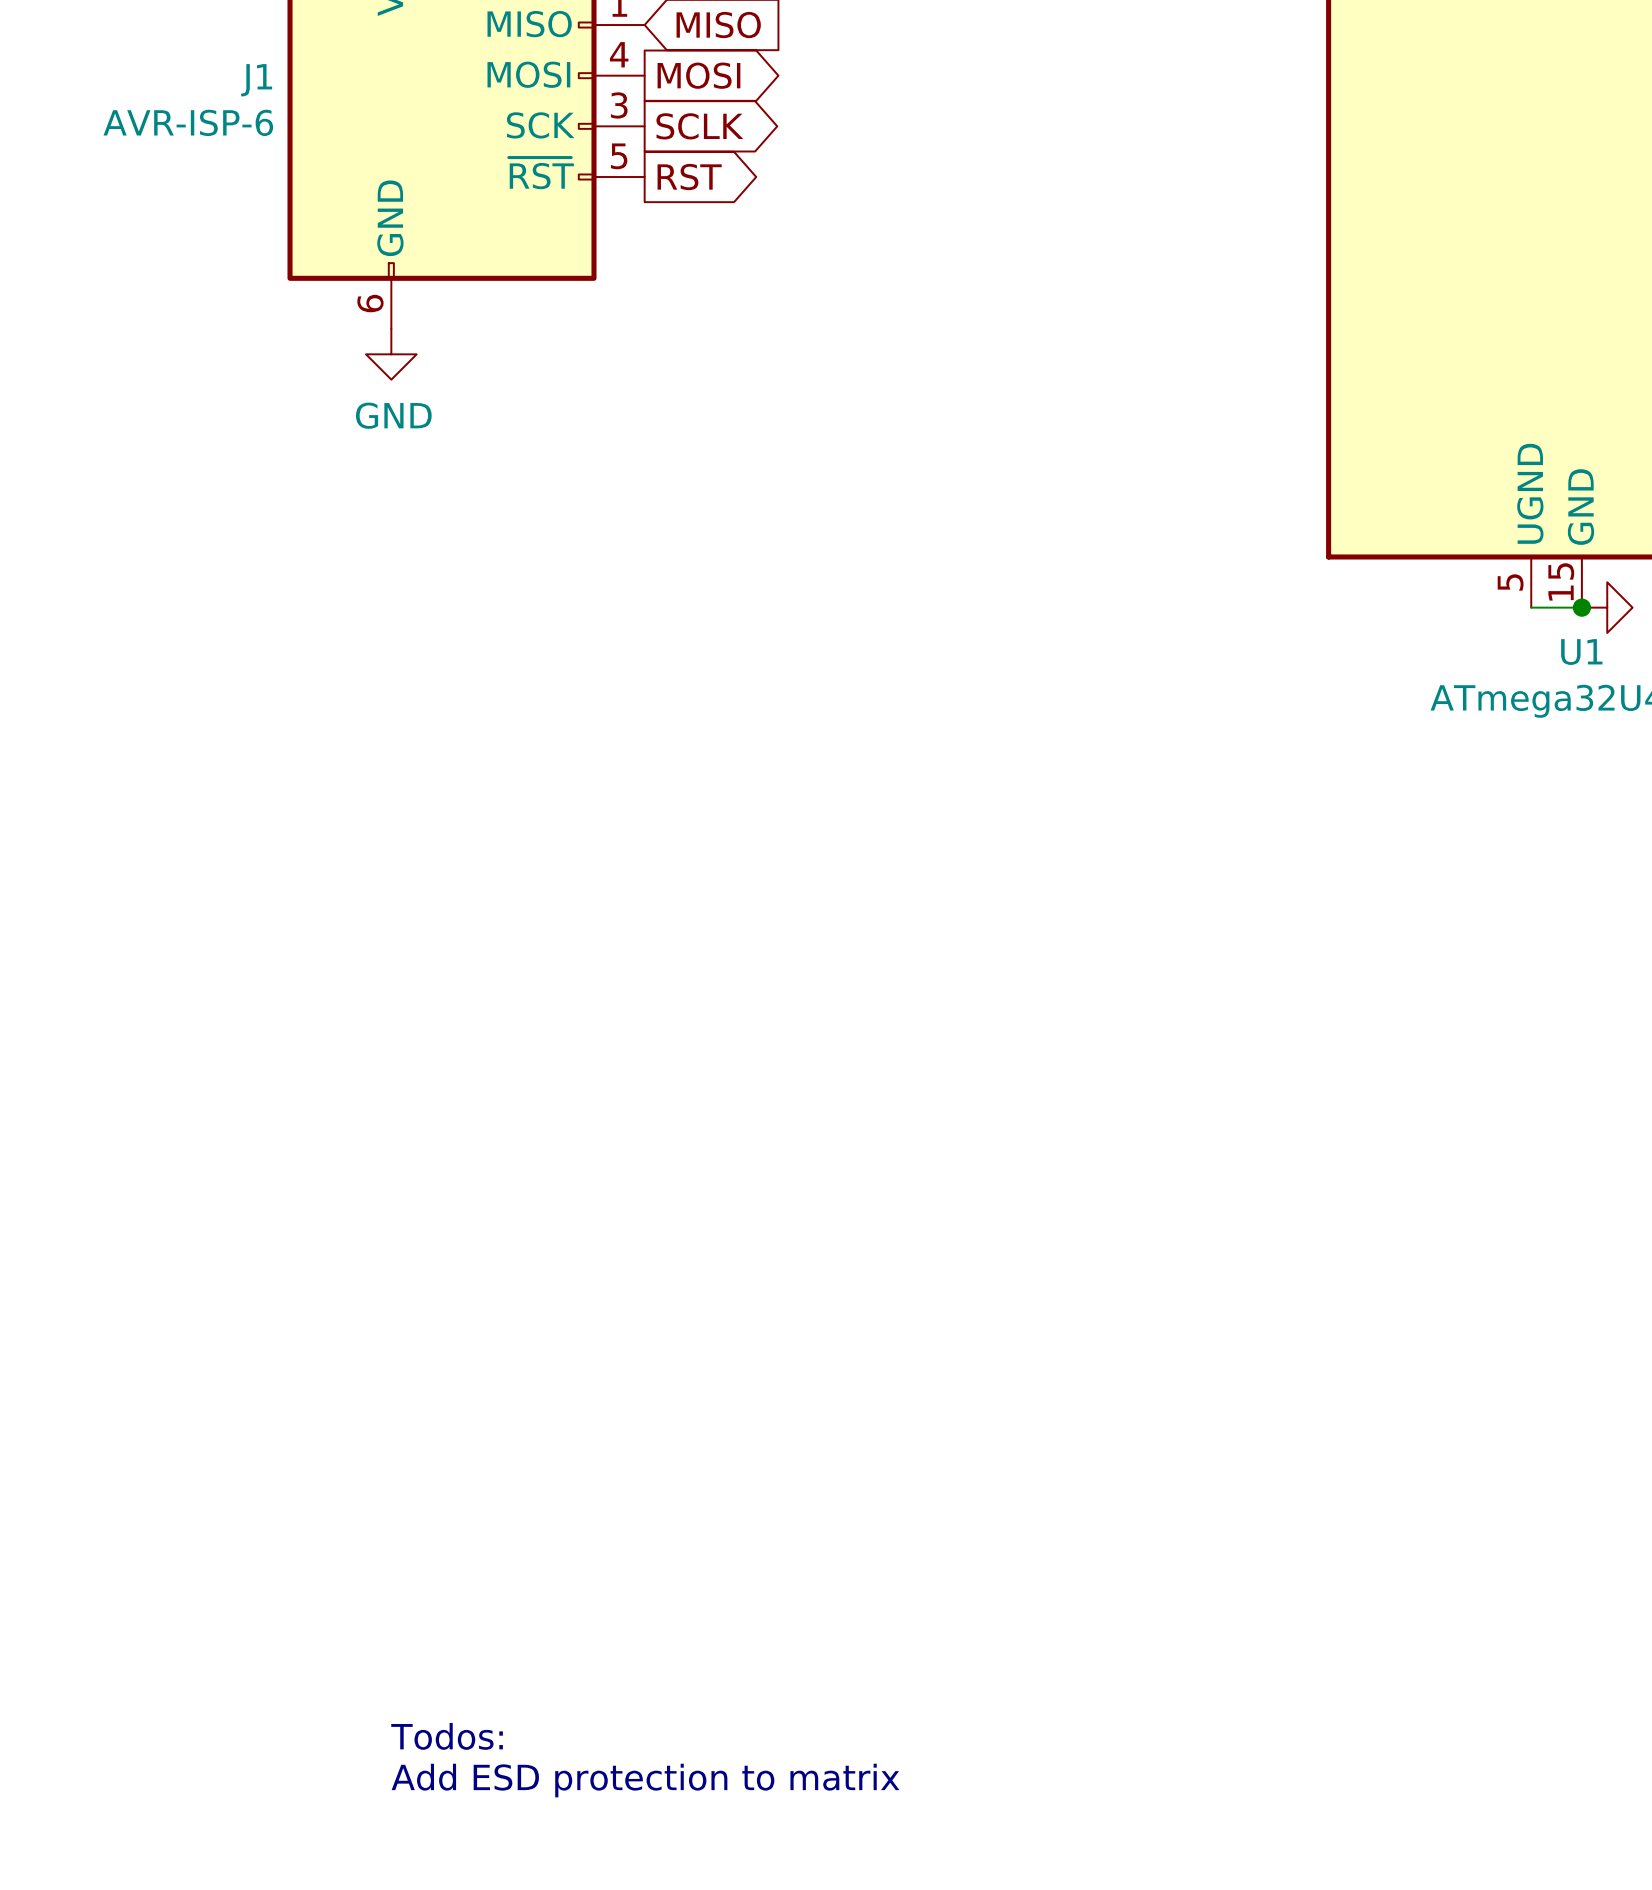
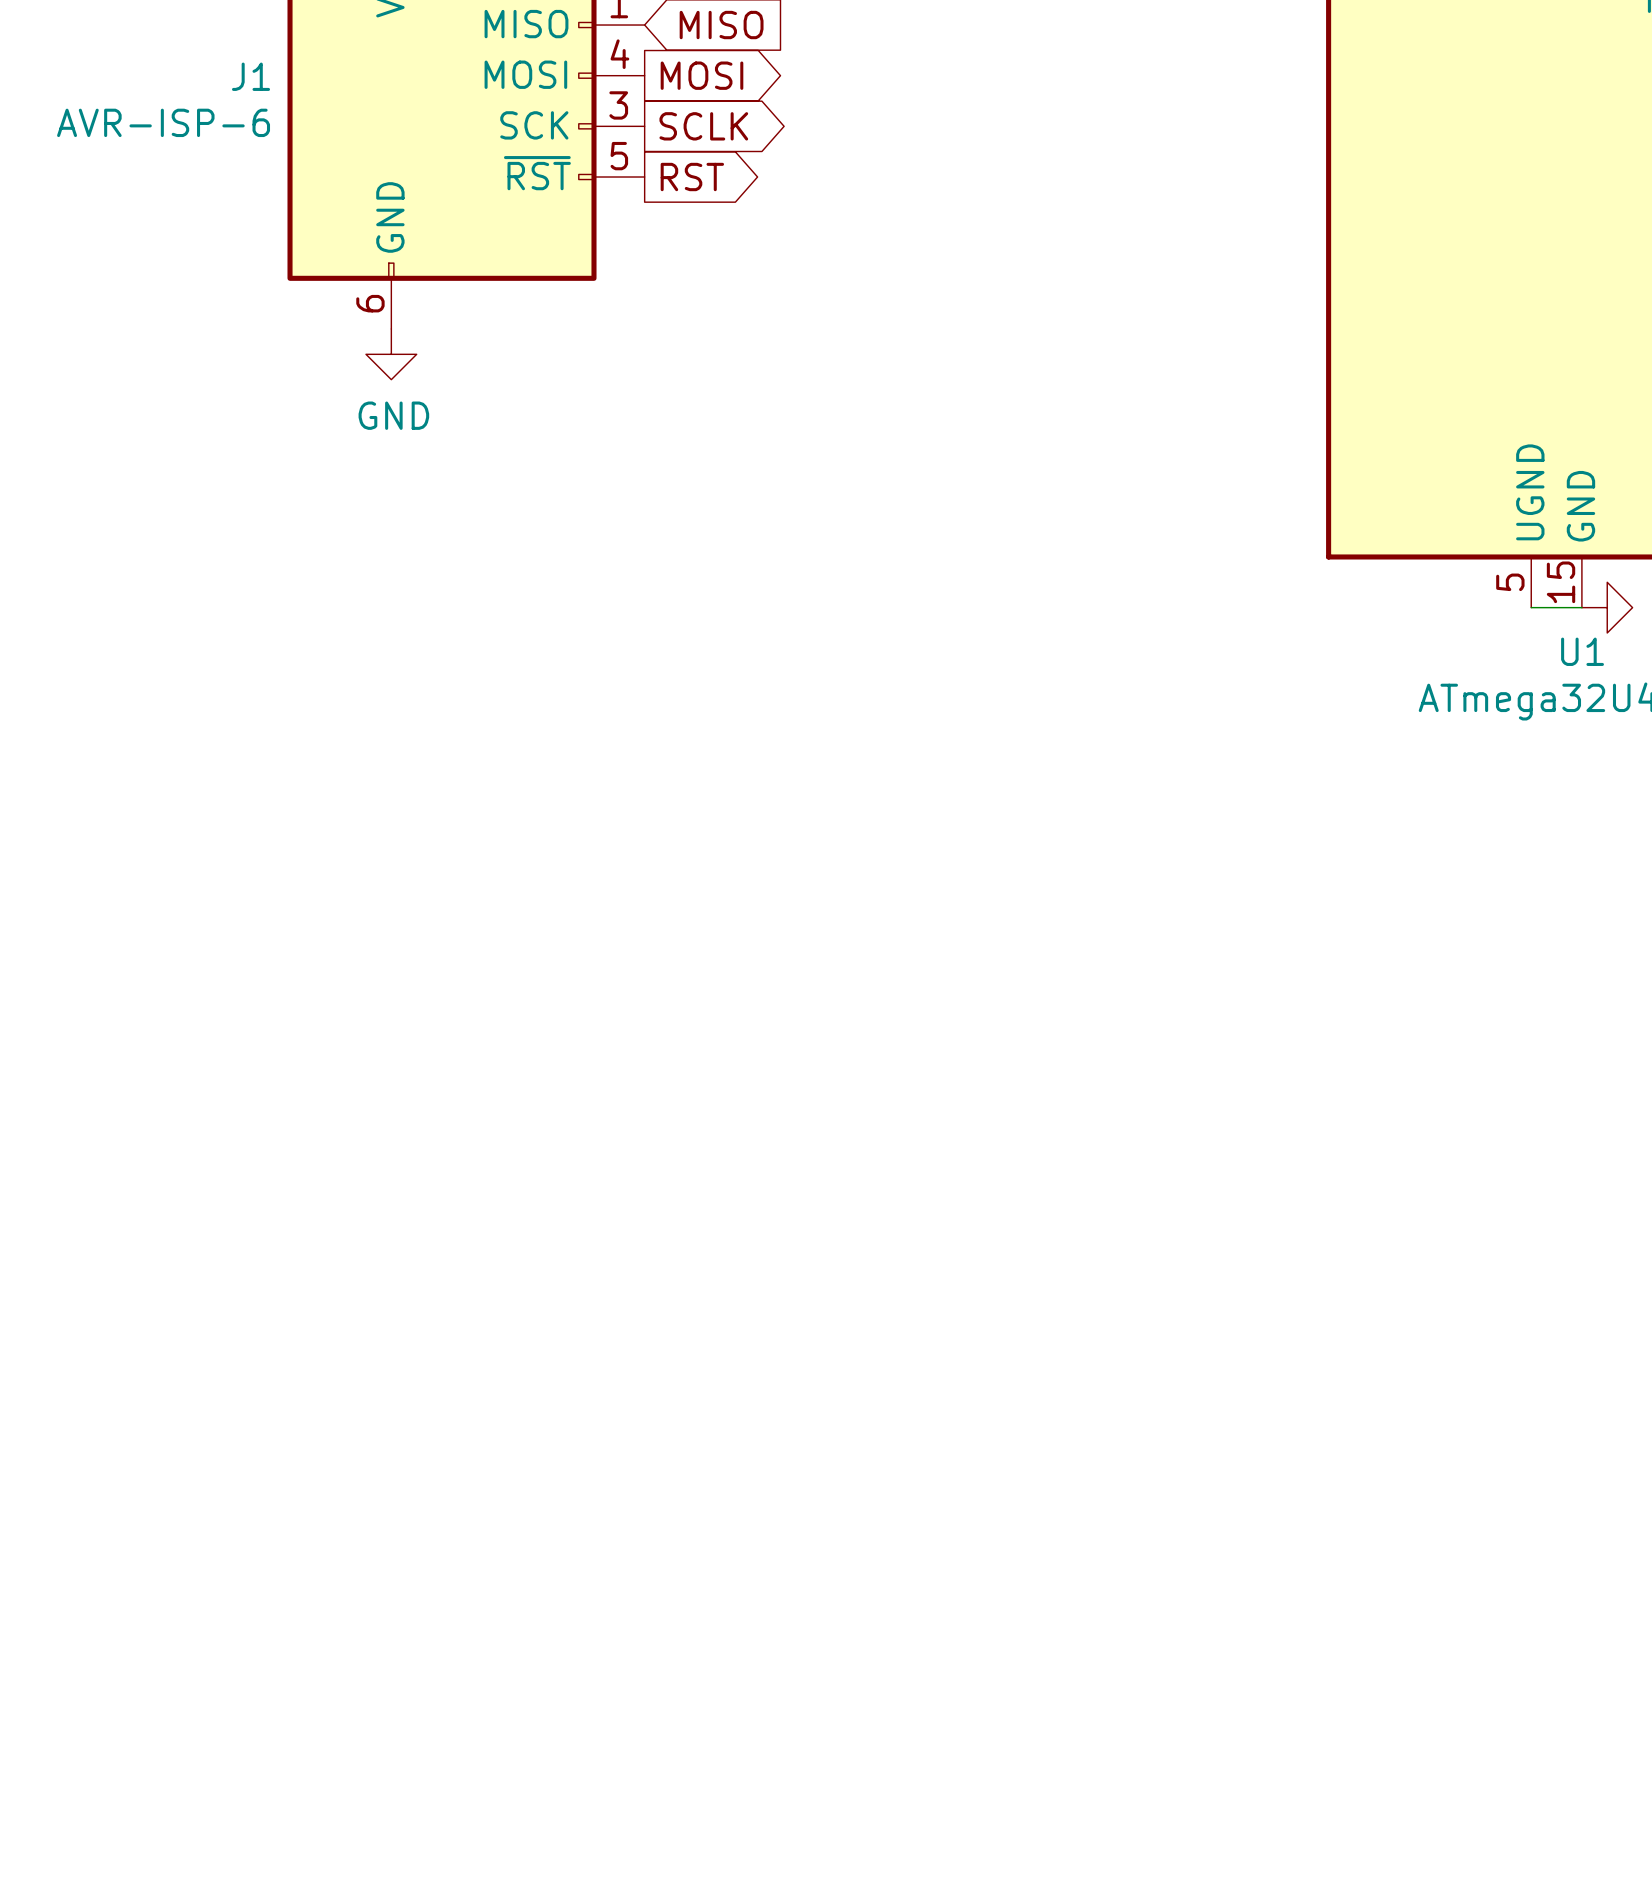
junction: (1581, 607) -> none
text: Todos: (447, 1736) -> none
text: Add ESD protection to matrix (645, 1780) -> none

